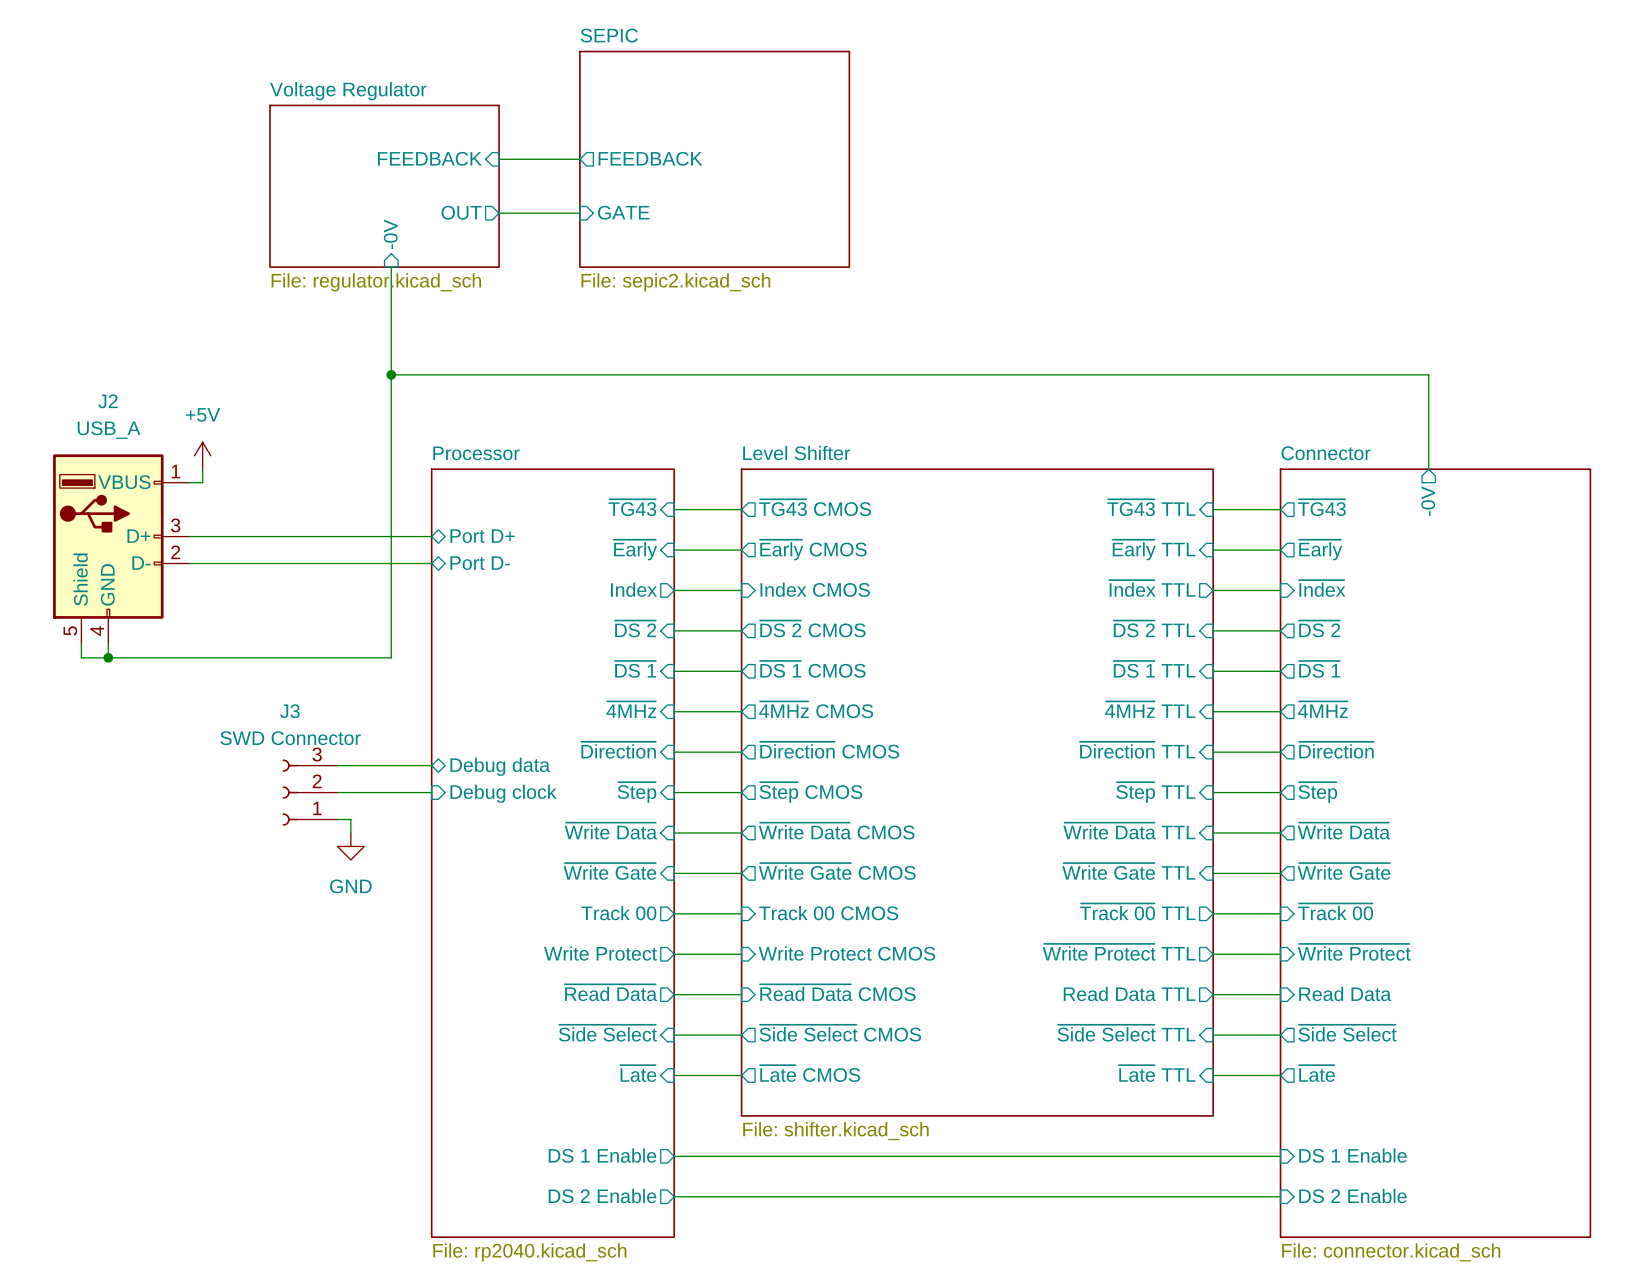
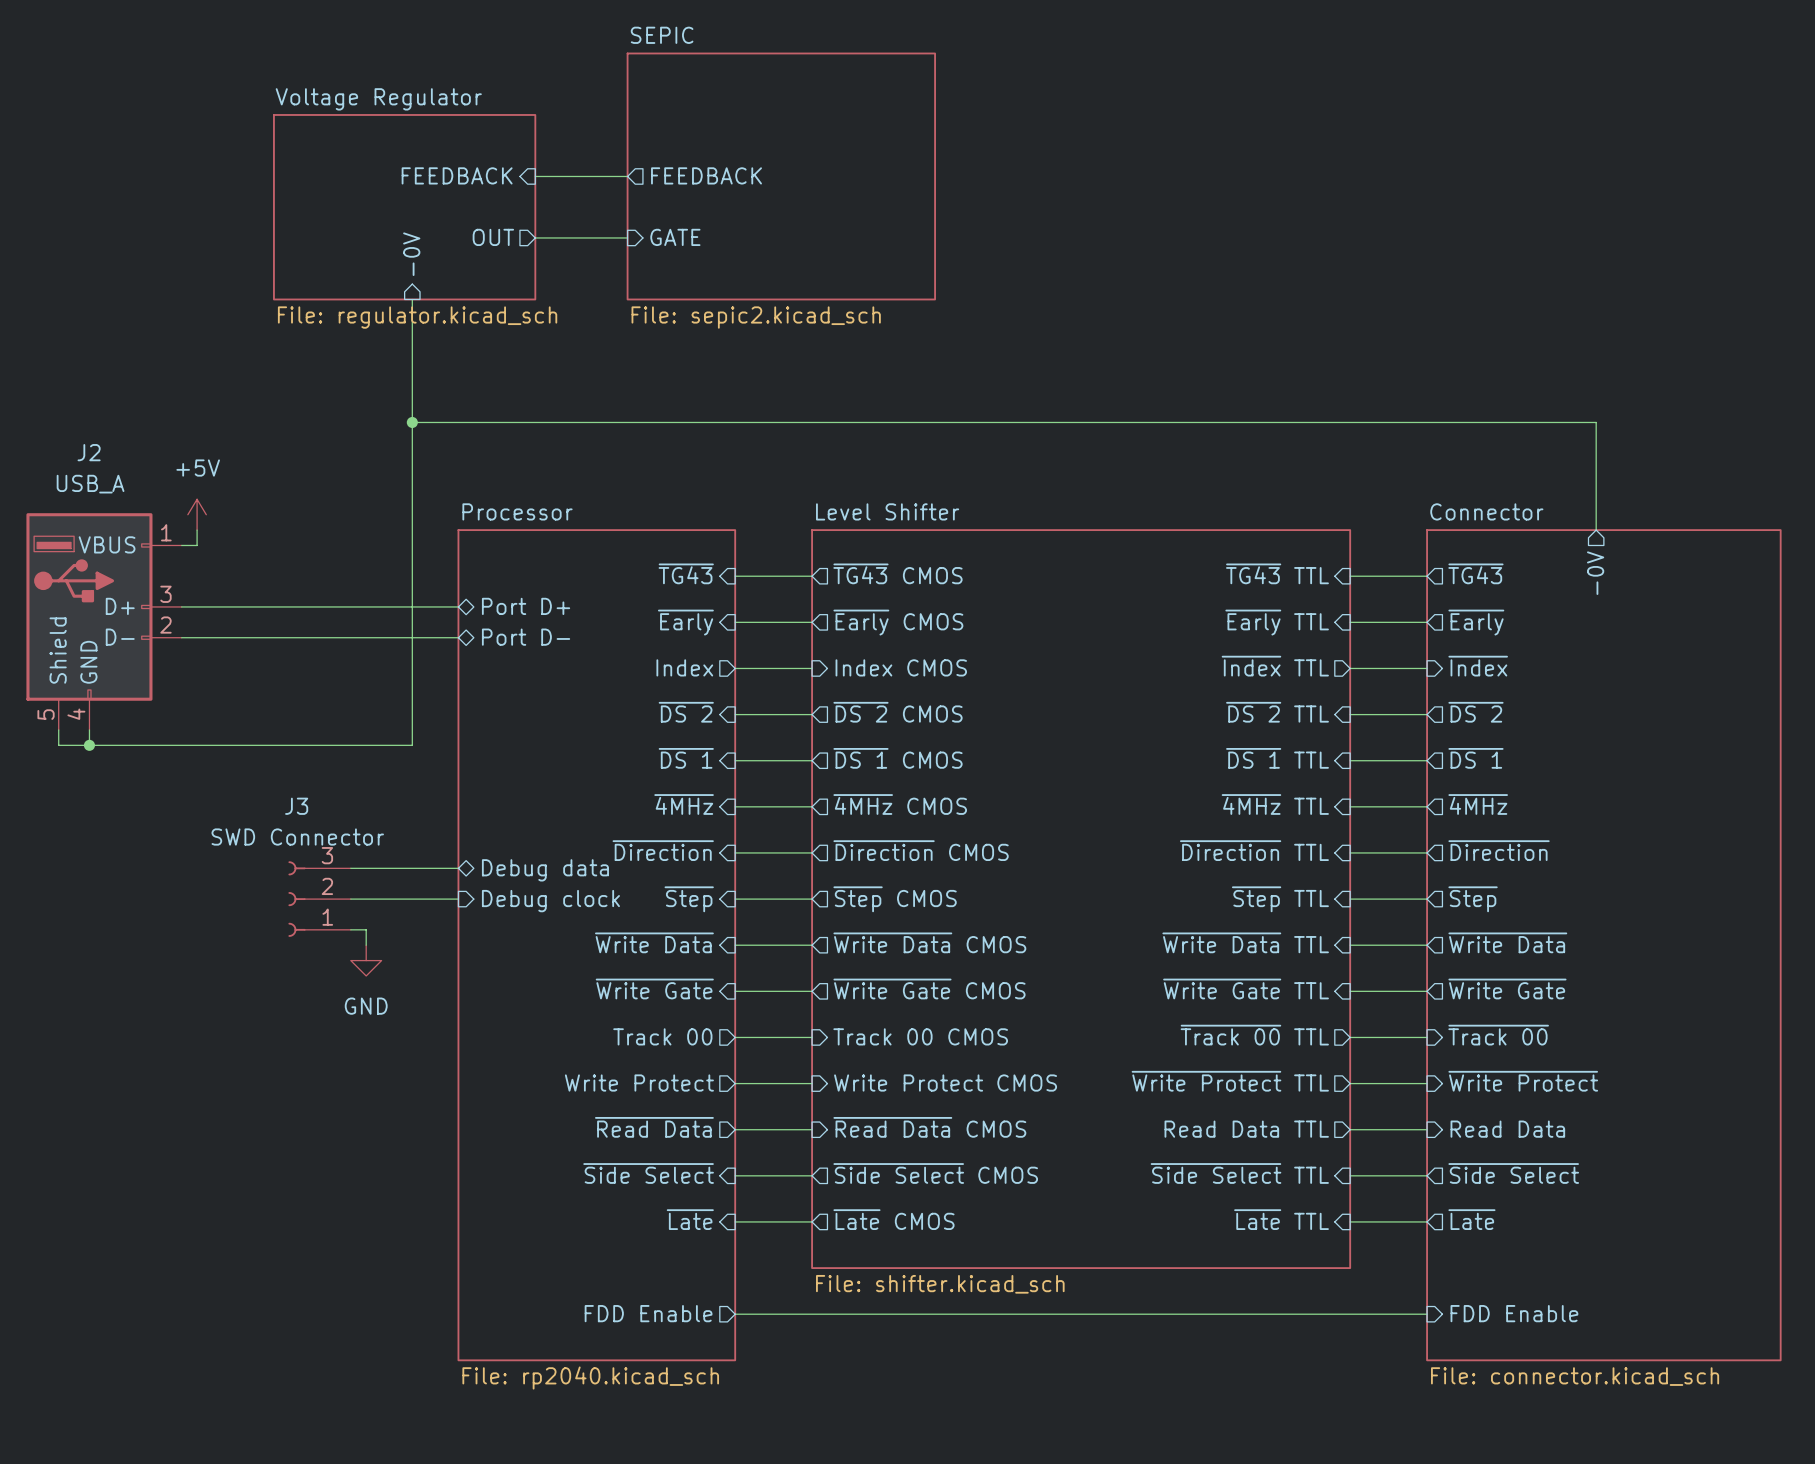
sheet Processor: none -> File: rp2040.kicad_sch (596, 945)
sheet Connector: none -> File: connector.kicad_sch (1603, 945)
sheet Processor: File: rp2040.kicad_sch (552, 853) -> none
sheet Connector: File: connector.kicad_sch (1435, 853) -> none
sheet pin: DS 1 Enable (602, 1155) -> FDD Enable (648, 1313)
sheet pin: DS 1 Enable (1352, 1155) -> FDD Enable (1514, 1313)
sheet pin: DS 2 Enable (602, 1196) -> none
wire: (674, 1196) (1280, 1196) -> none
sheet pin: DS 2 Enable (1352, 1196) -> none

